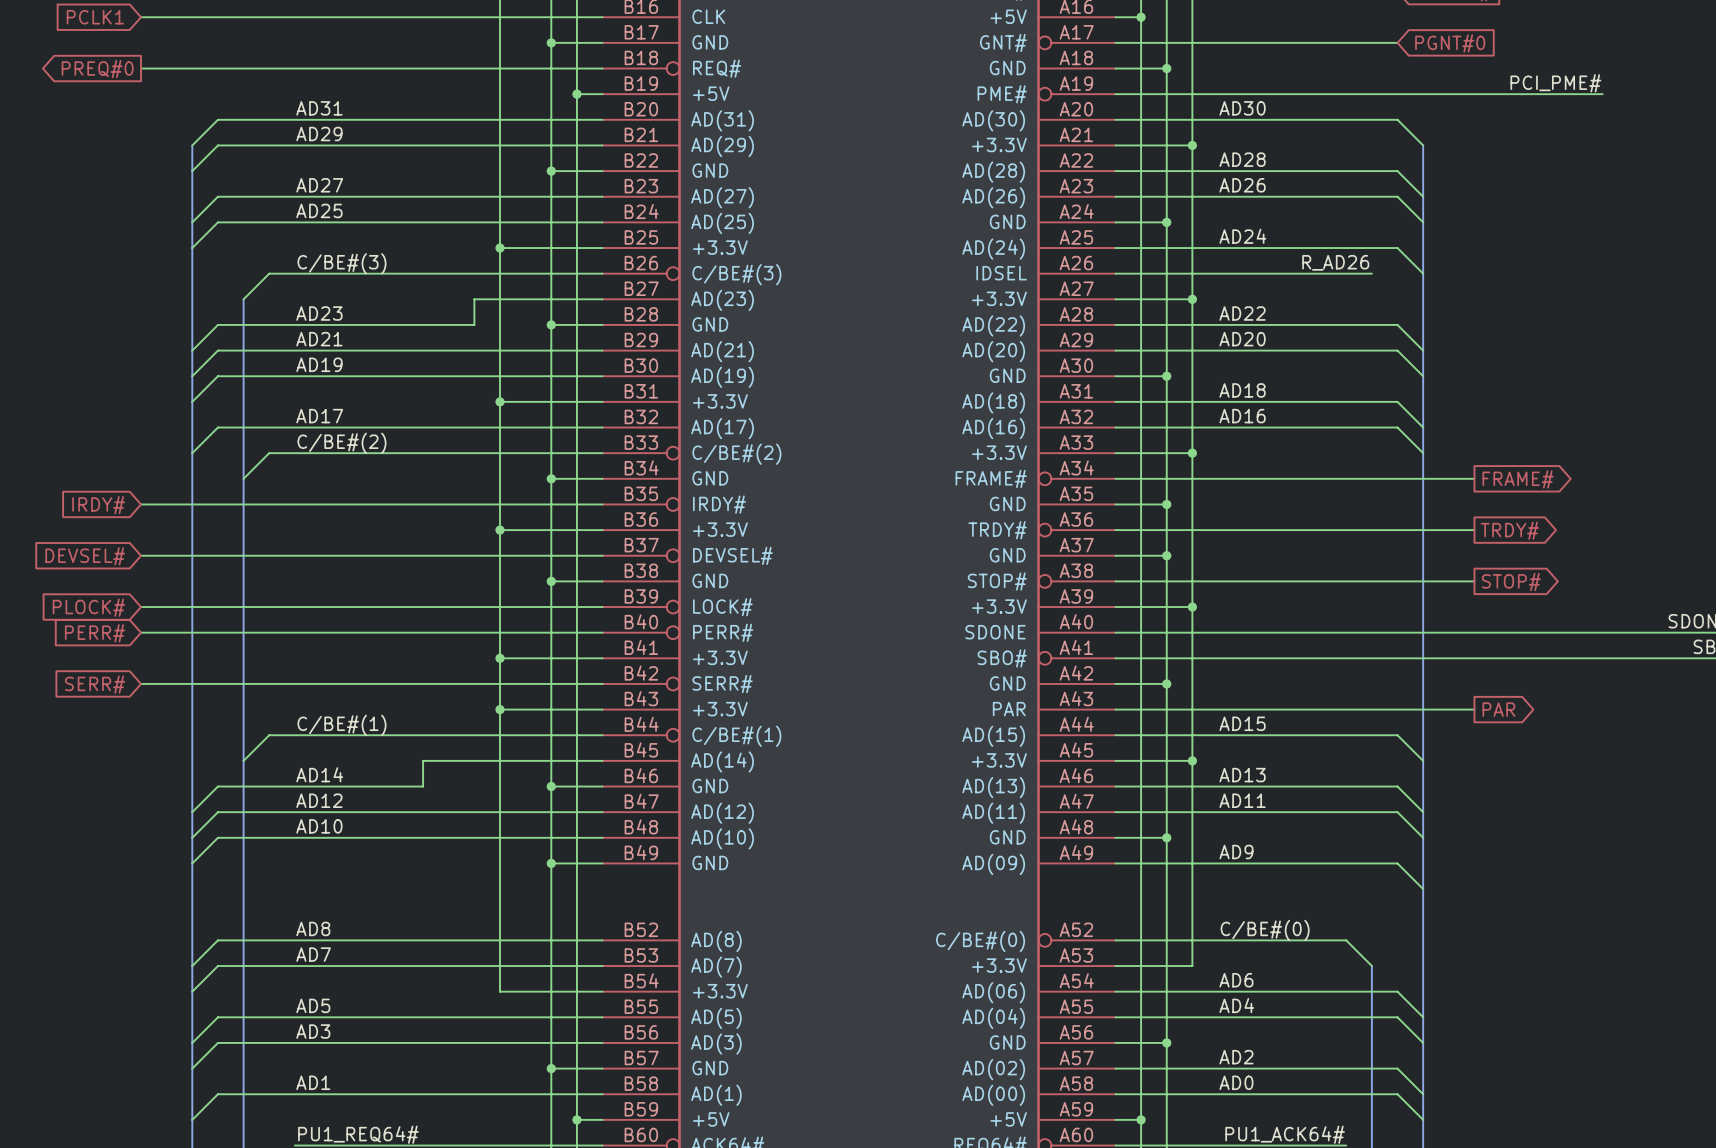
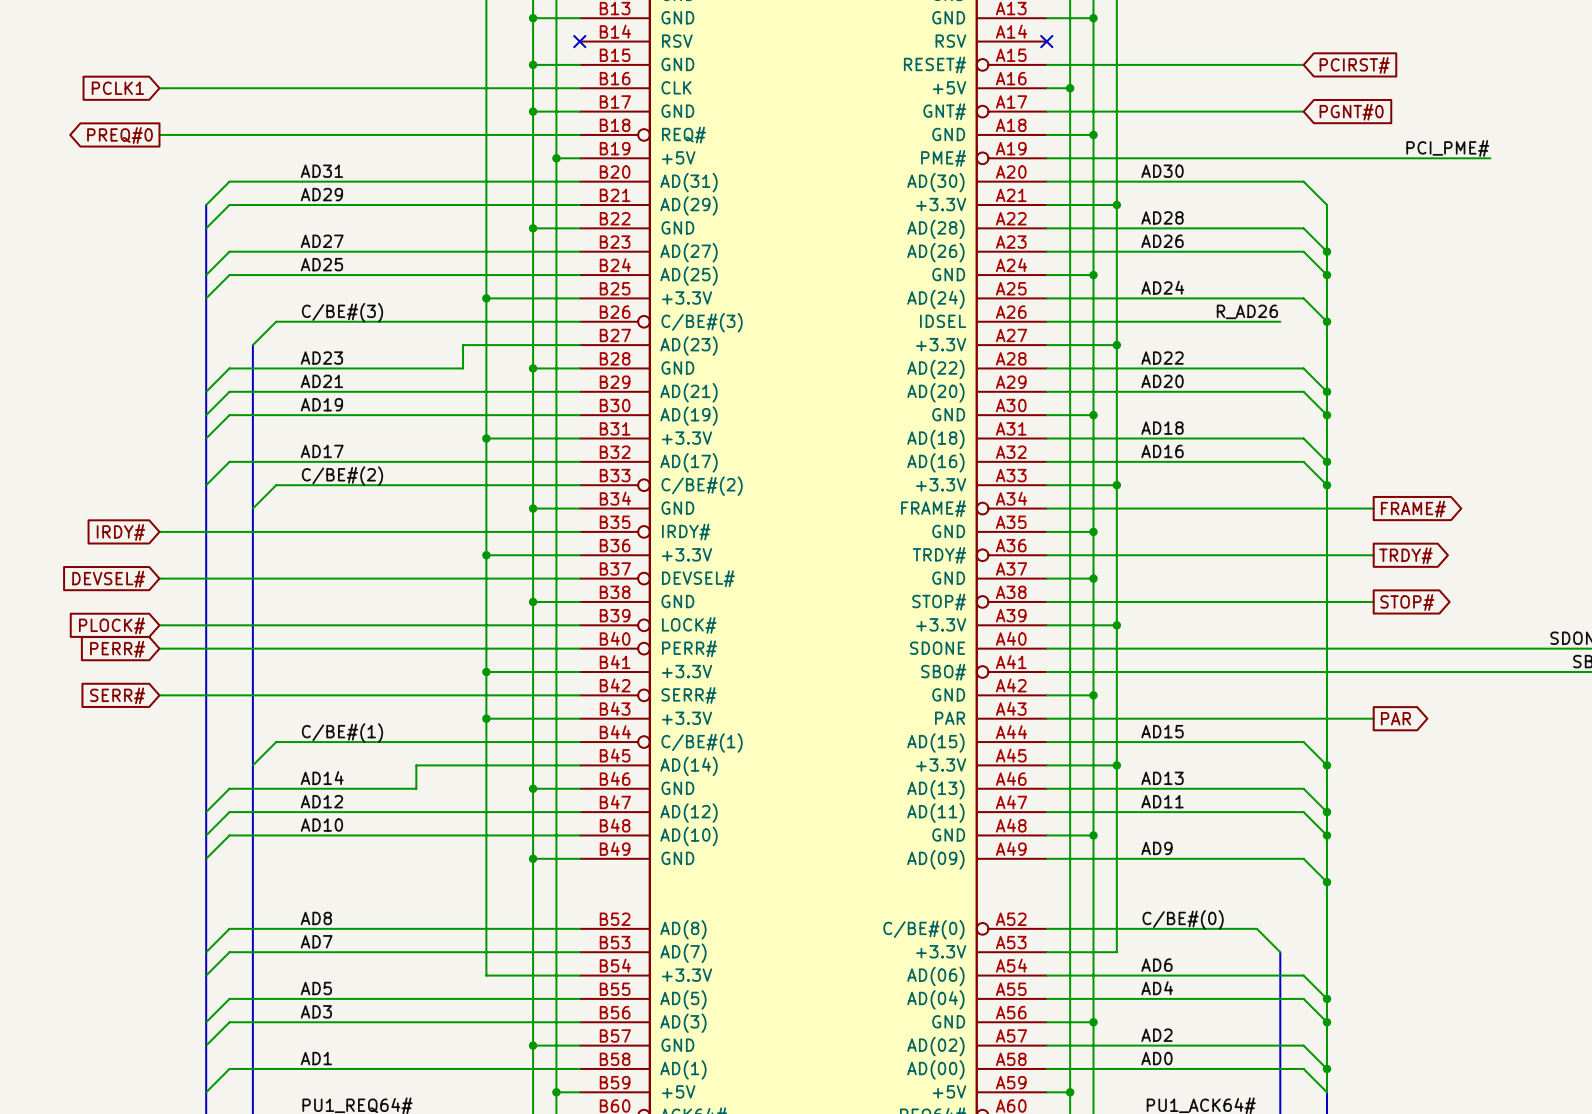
bus: (1423, 145) (1423, 1119) -> none
junction: none -> (1326, 251)
junction: none -> (1326, 275)
junction: none -> (1326, 321)
junction: none -> (1326, 391)
junction: none -> (1326, 415)
junction: none -> (1326, 461)
junction: none -> (1326, 485)
junction: none -> (1326, 765)
junction: none -> (1326, 812)
junction: none -> (1326, 835)
junction: none -> (1326, 882)
junction: none -> (1326, 998)
junction: none -> (1326, 1022)
junction: none -> (1326, 1068)

